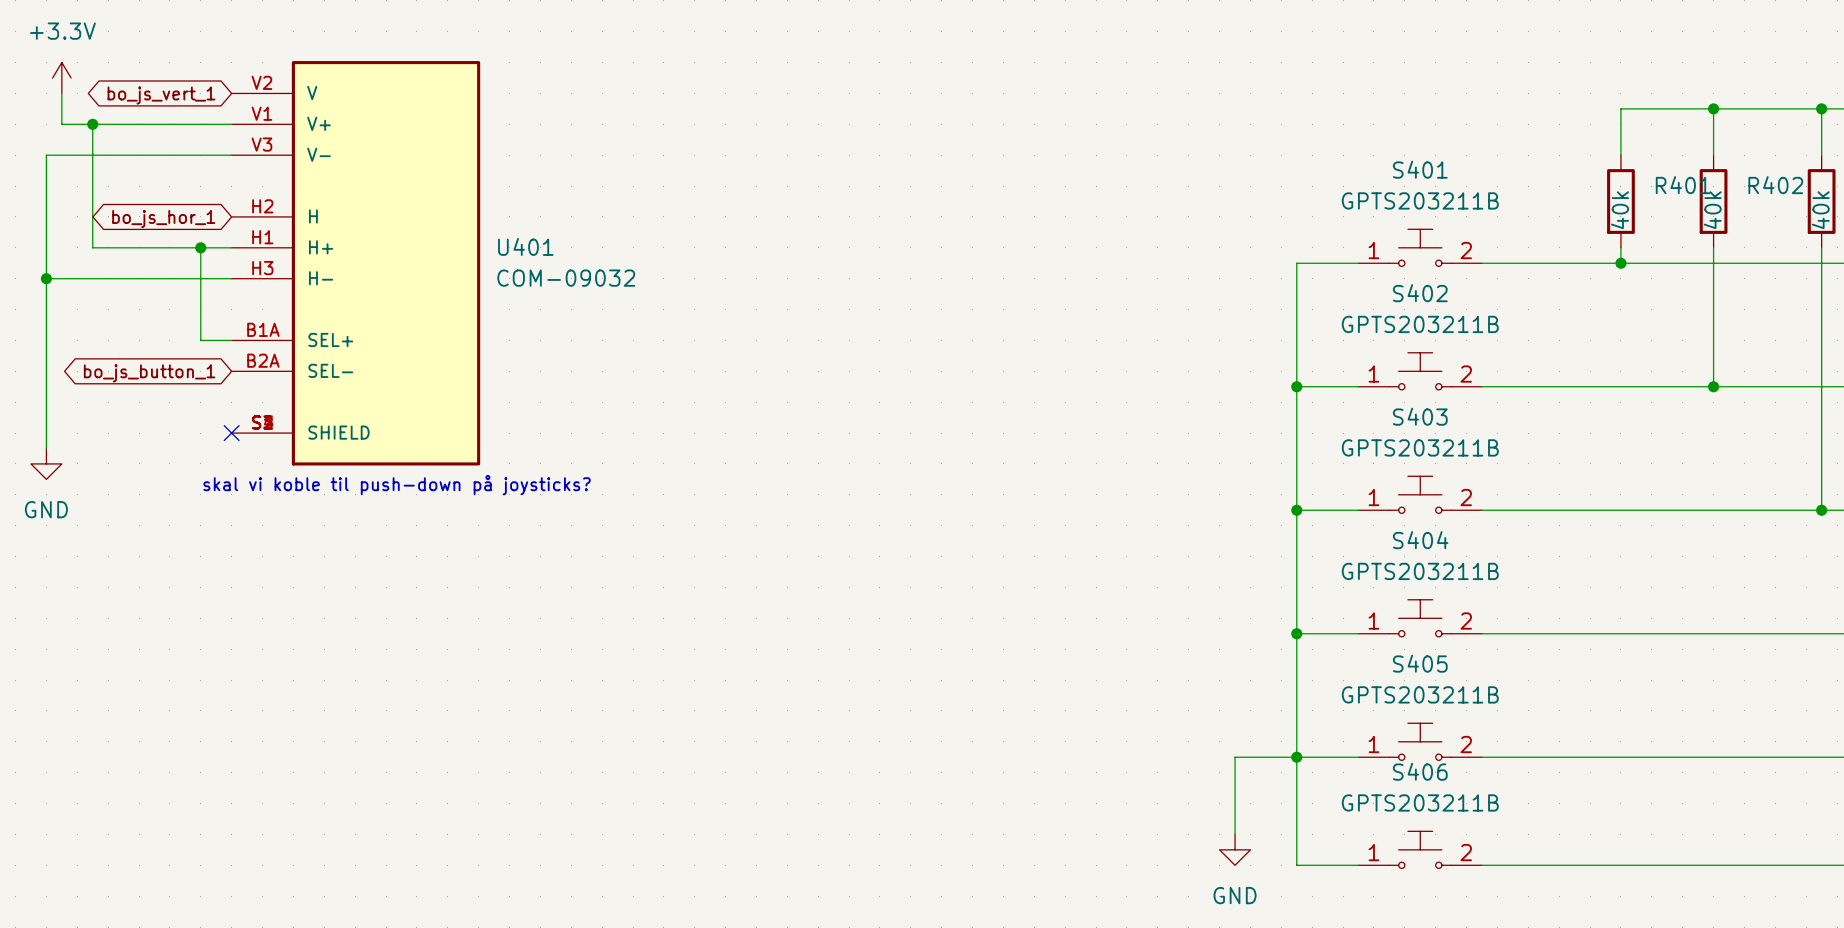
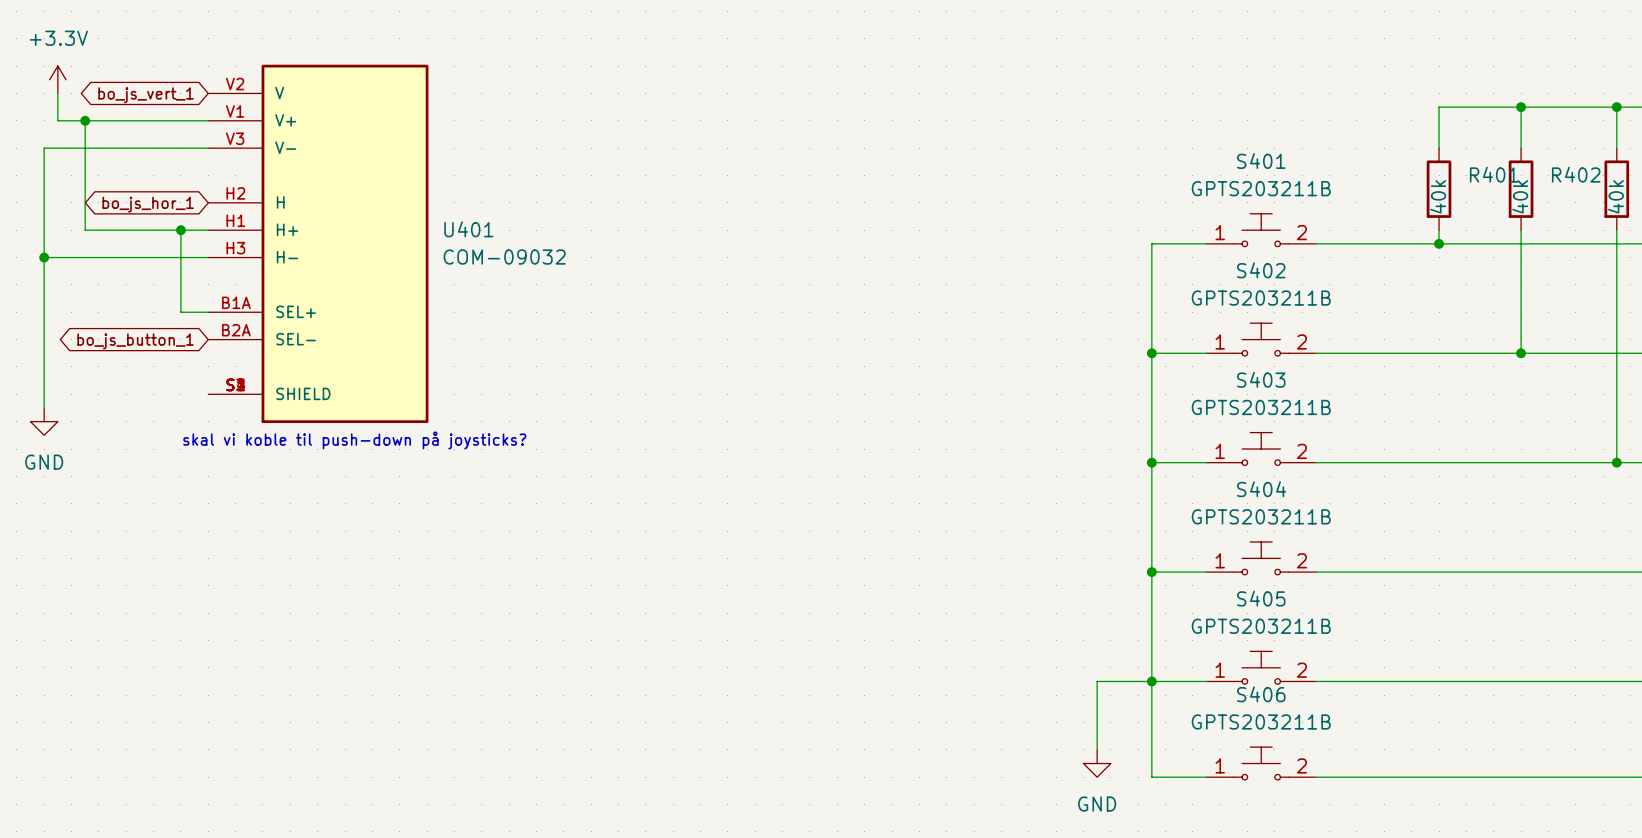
no-connect mark: (231, 433) -> none

